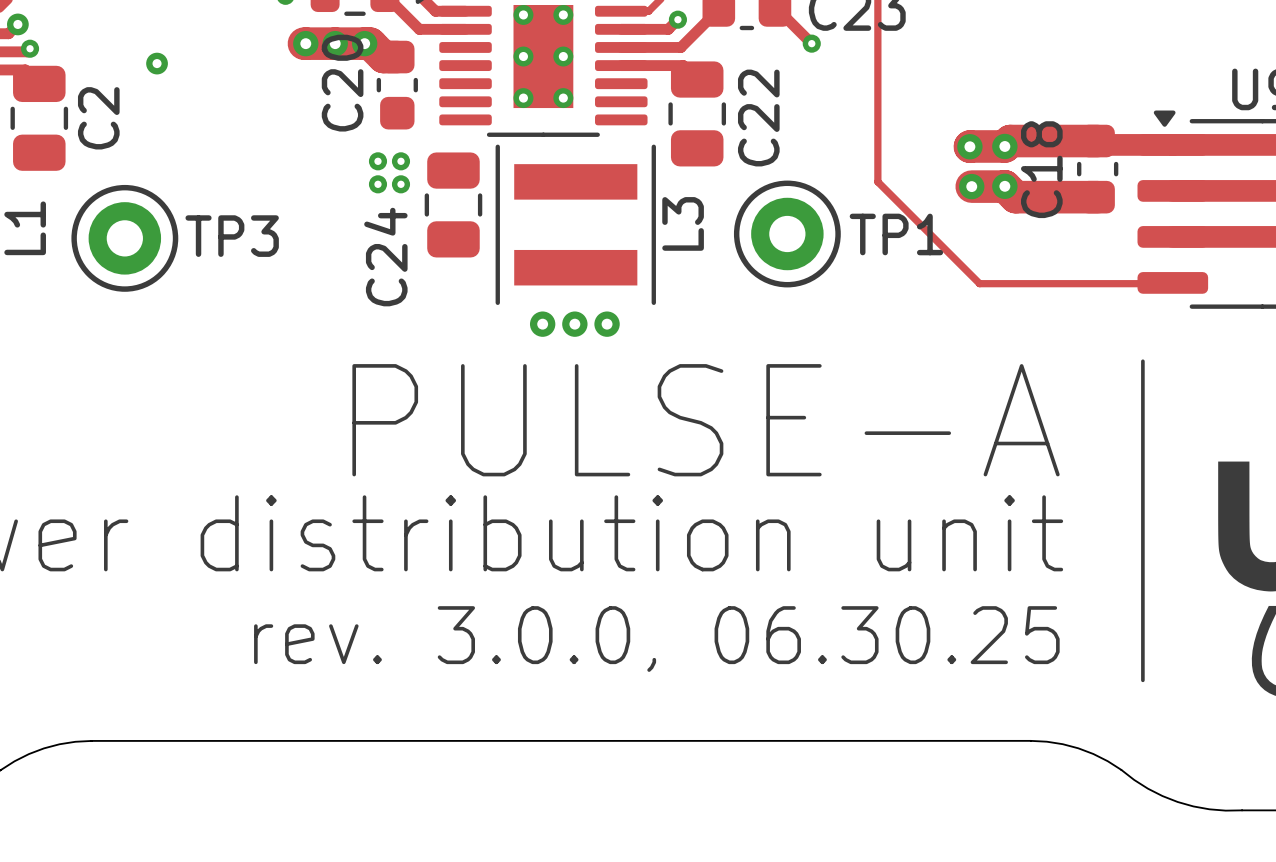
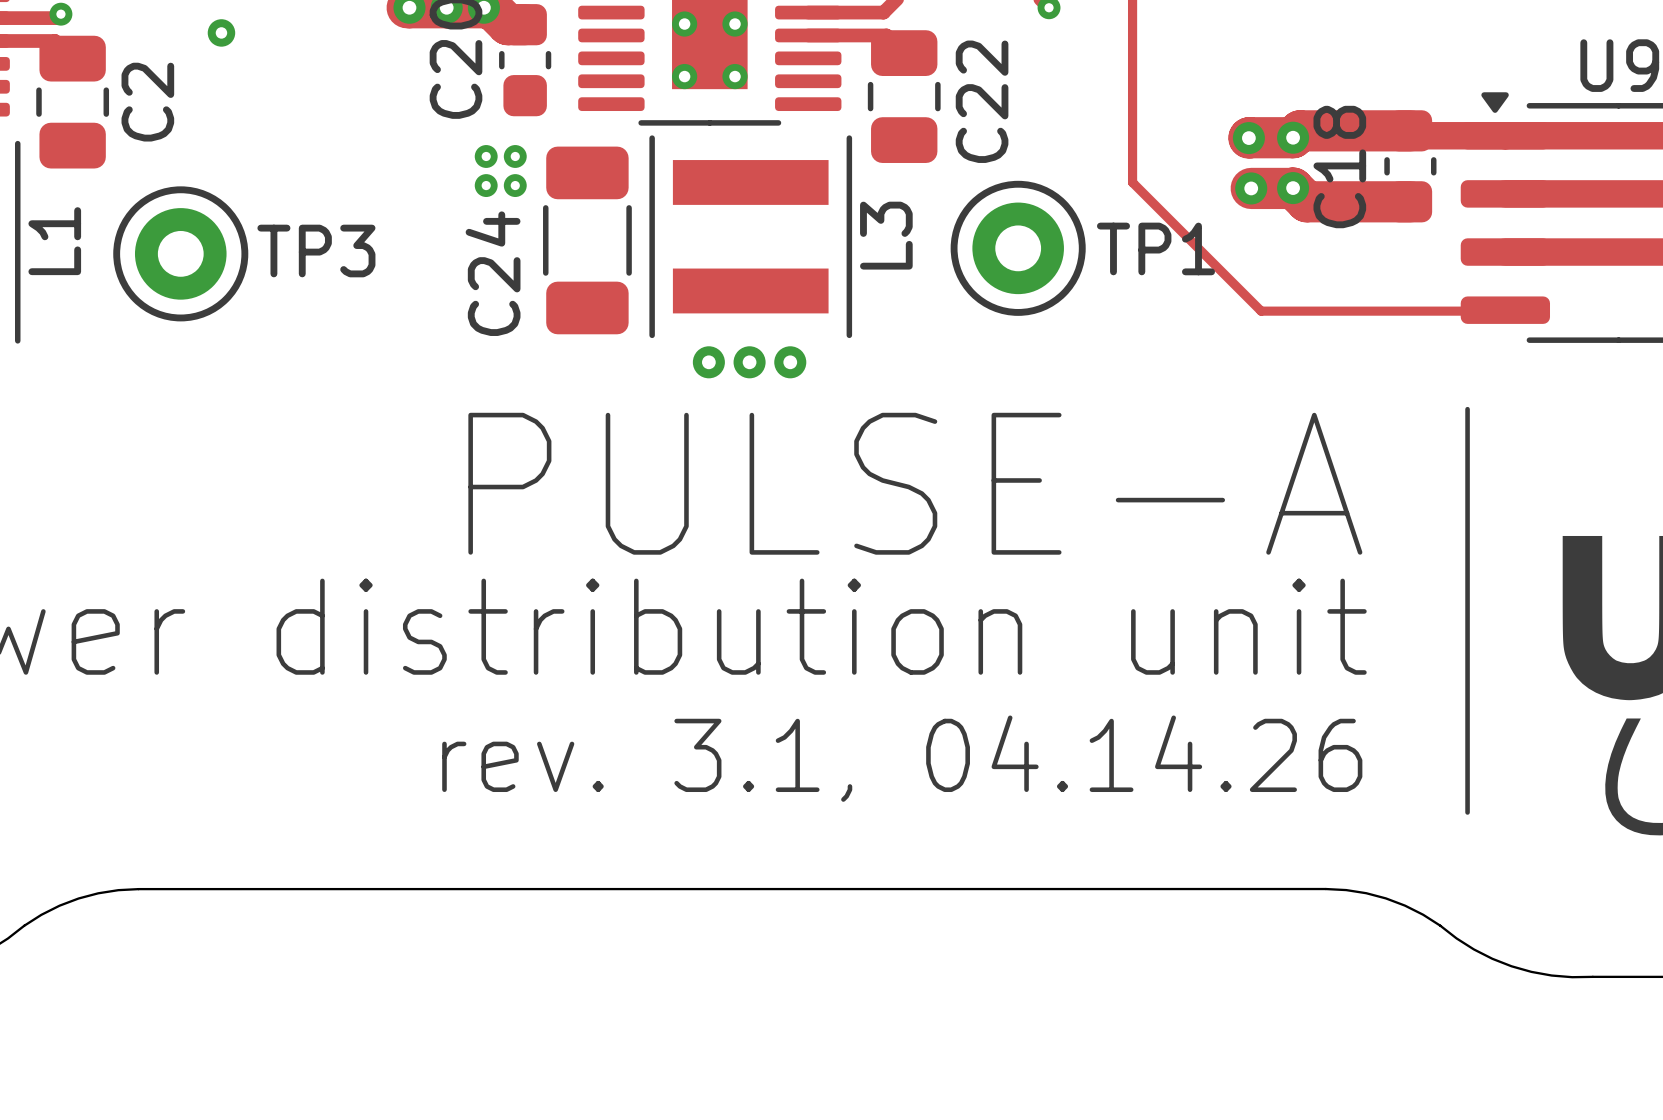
C24 footprint: [424, 152, 483, 258] -> [543, 146, 632, 335]
via: none -> (486, 156)
via: (377, 161) -> none
via: none -> (515, 156)
via: (400, 161) -> none
via: none -> (486, 185)
via: (377, 184) -> none
via: none -> (515, 185)
via: (400, 184) -> none
text: rev. 3.0.0, 06.30.25 (656, 639) -> rev. 3.1, 04.14.26 (902, 758)

